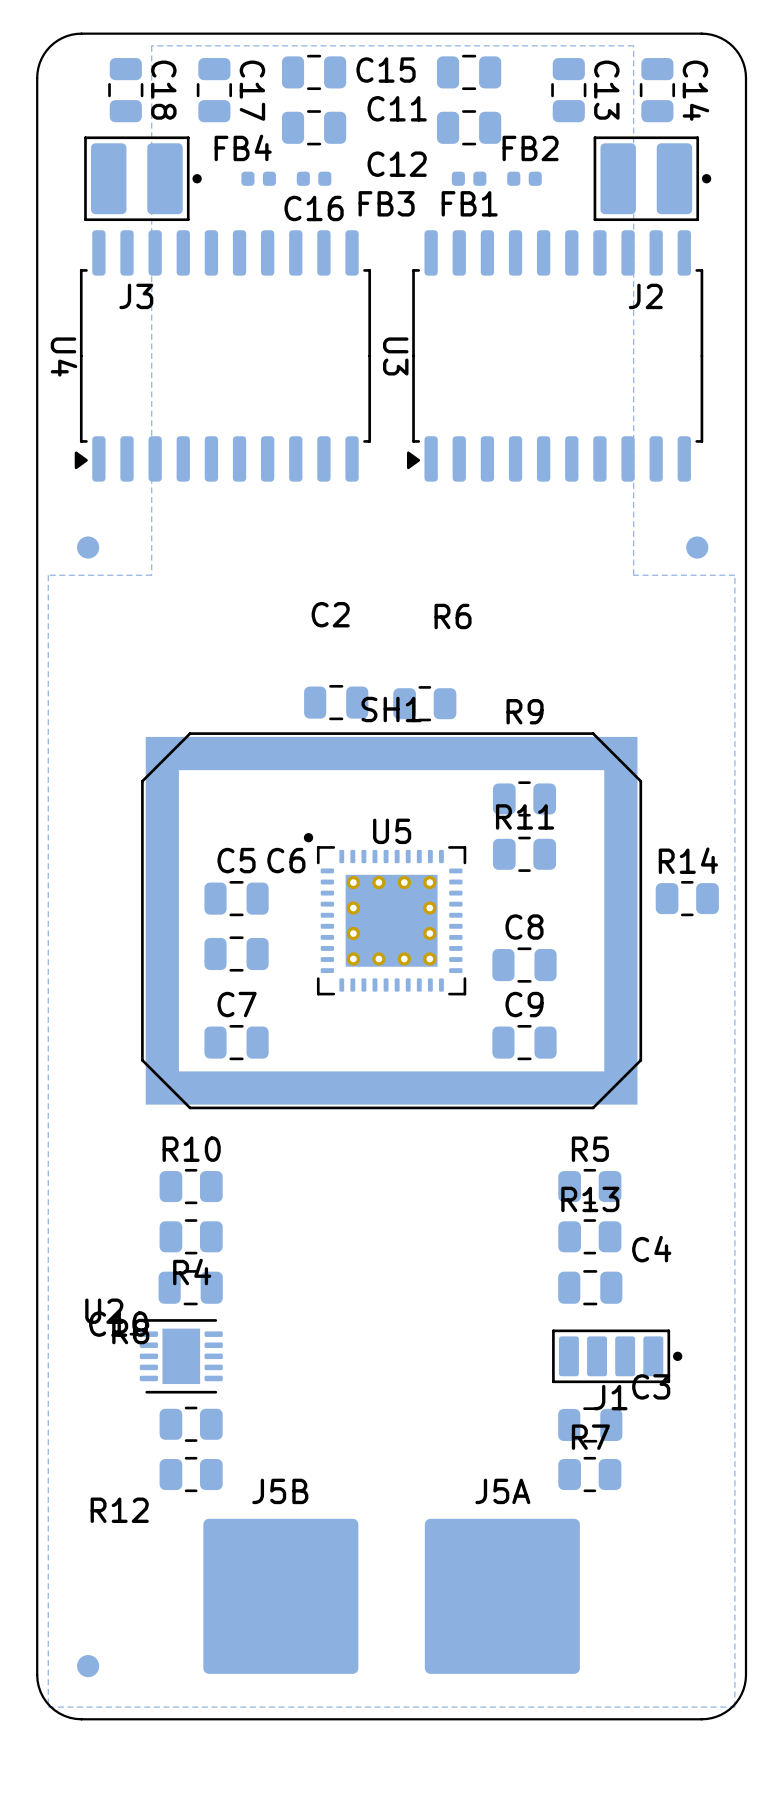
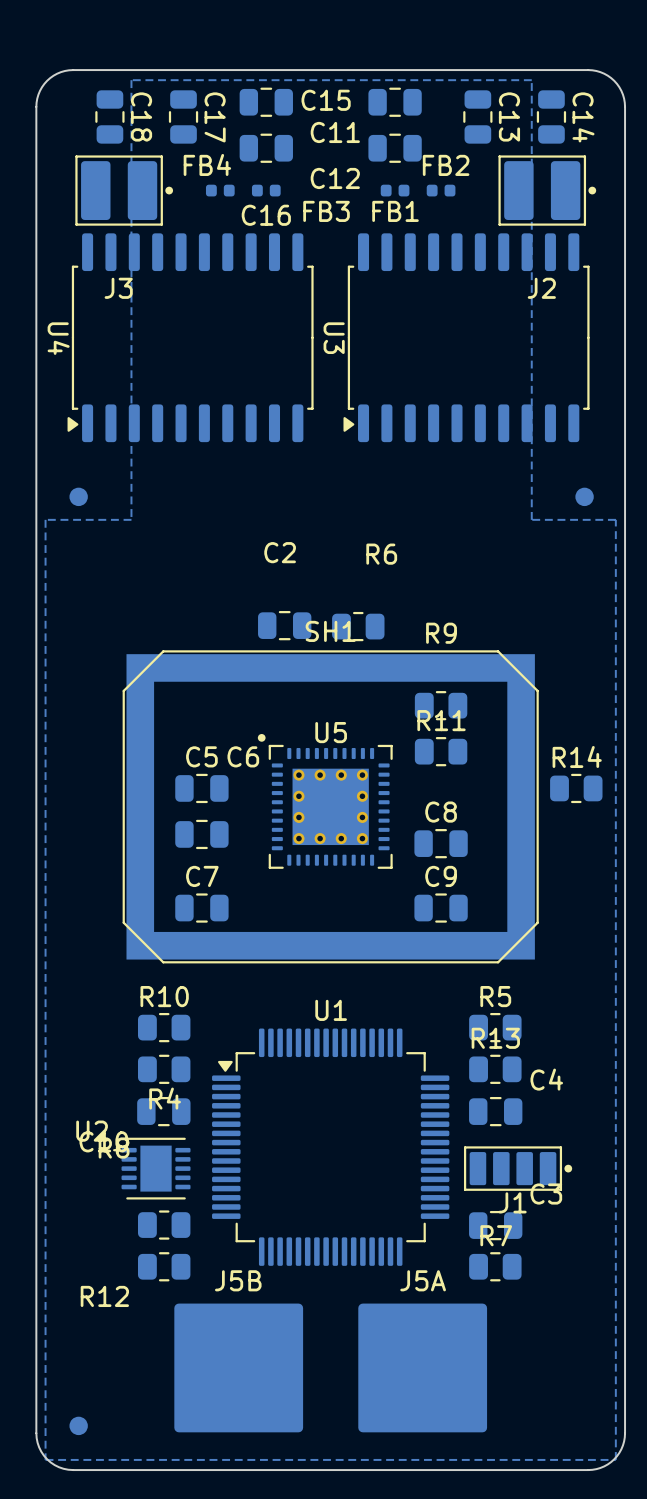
U1: none -> (330, 1147)

